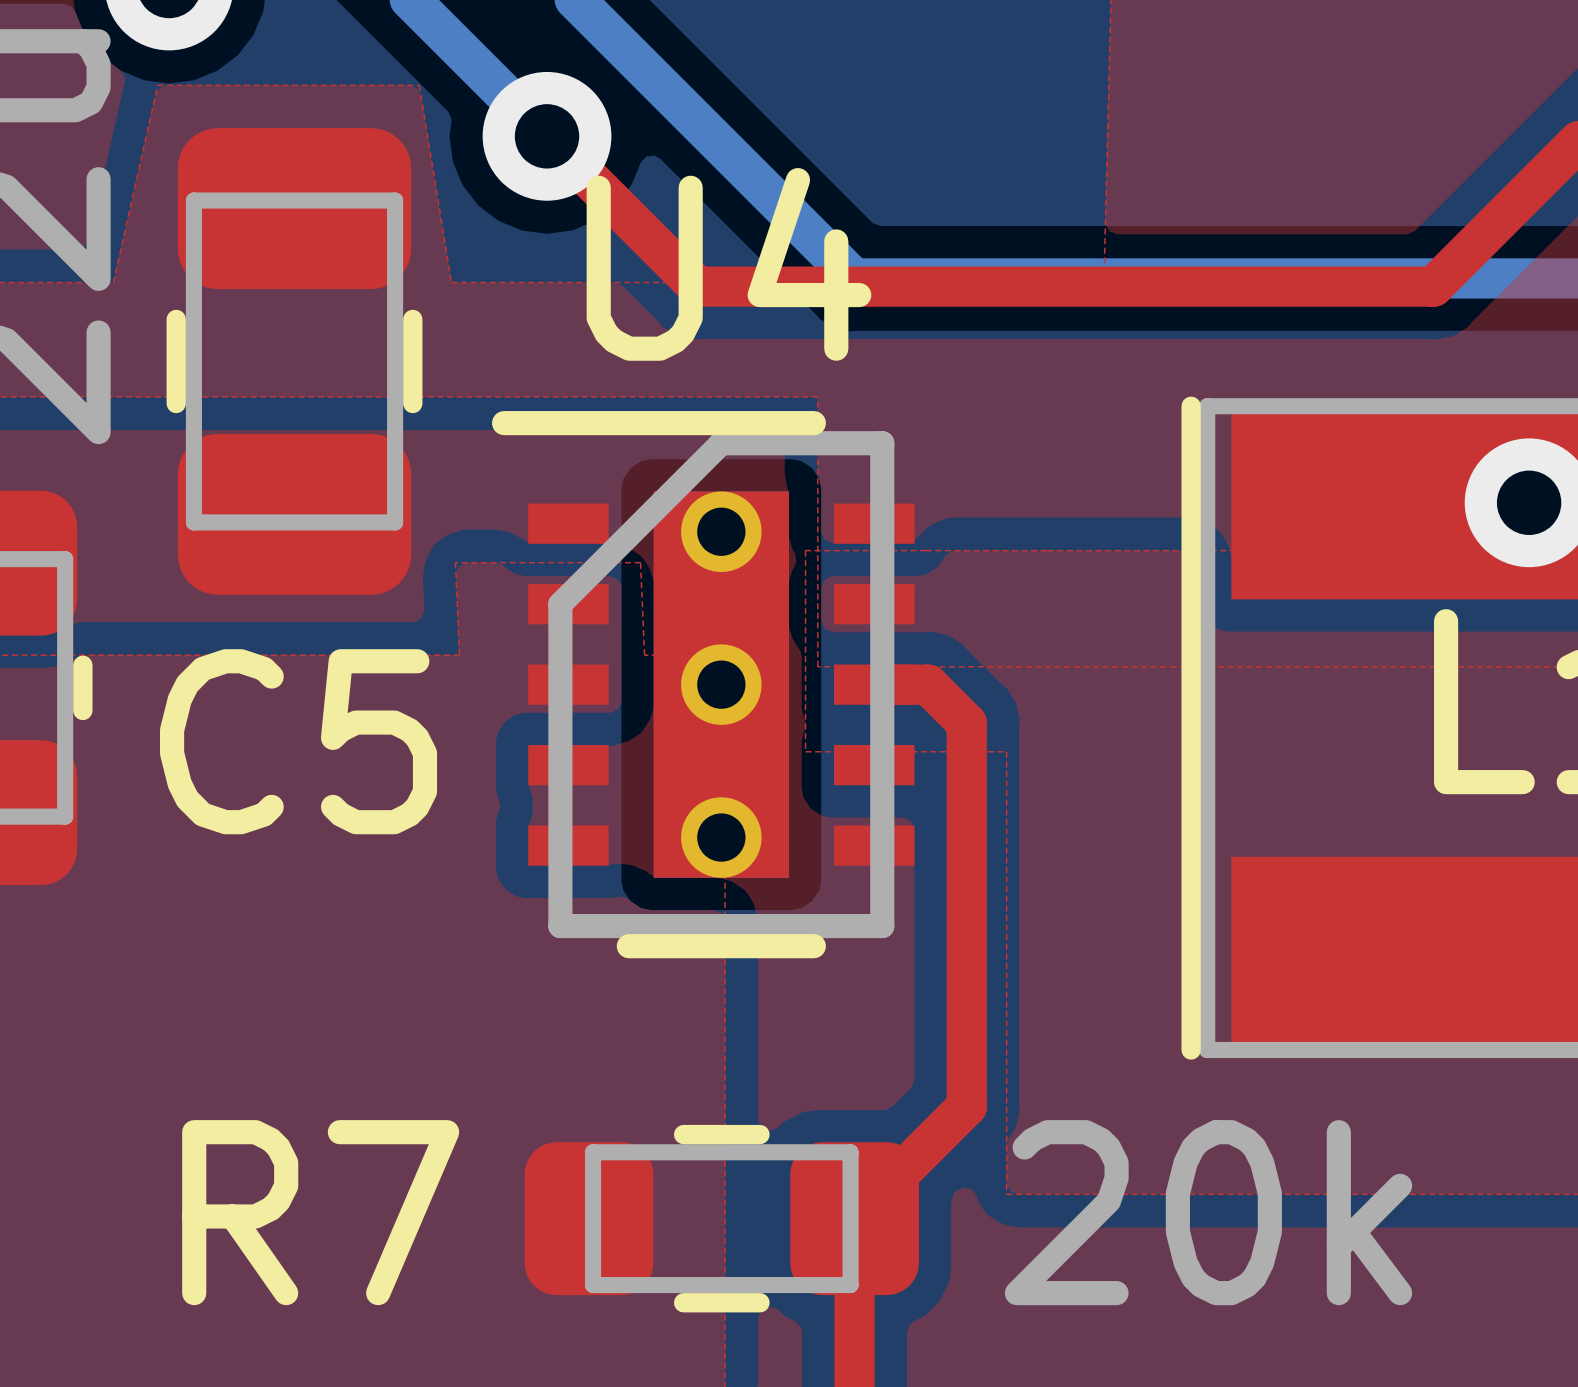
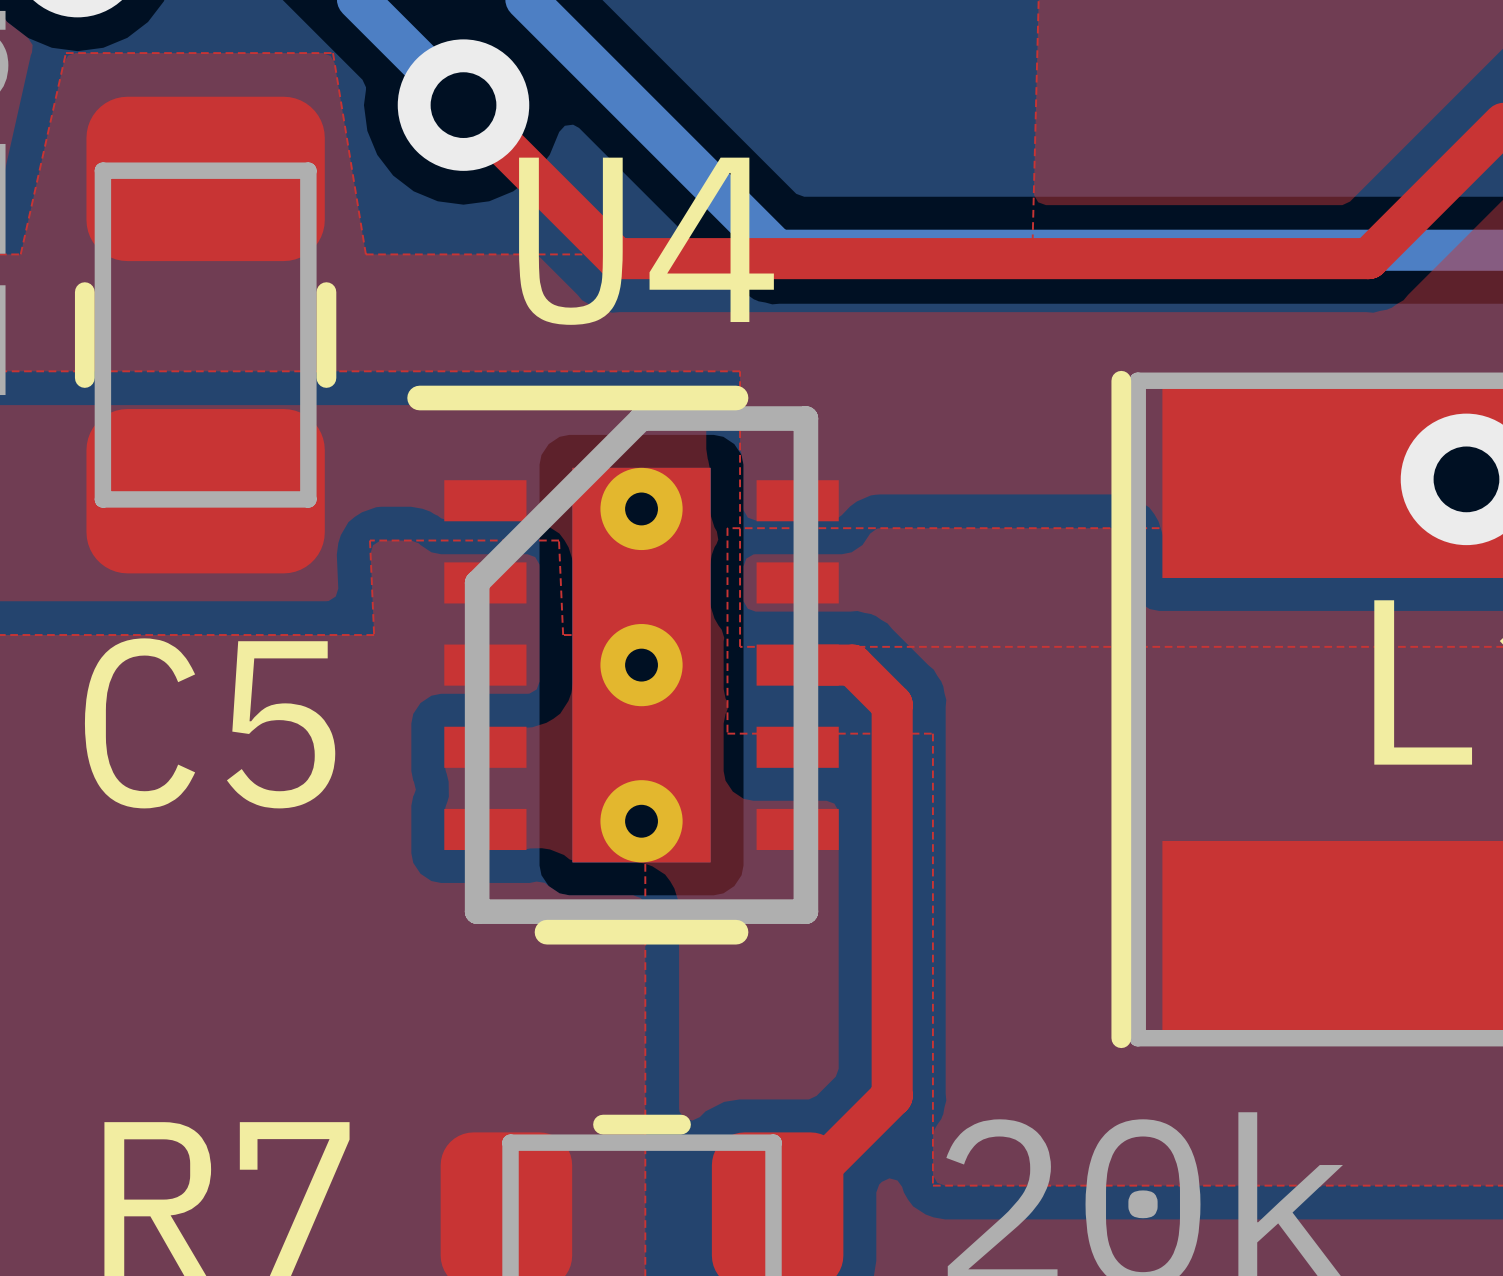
U4 footprint: [491, 411, 915, 959] -> [407, 385, 839, 945]

